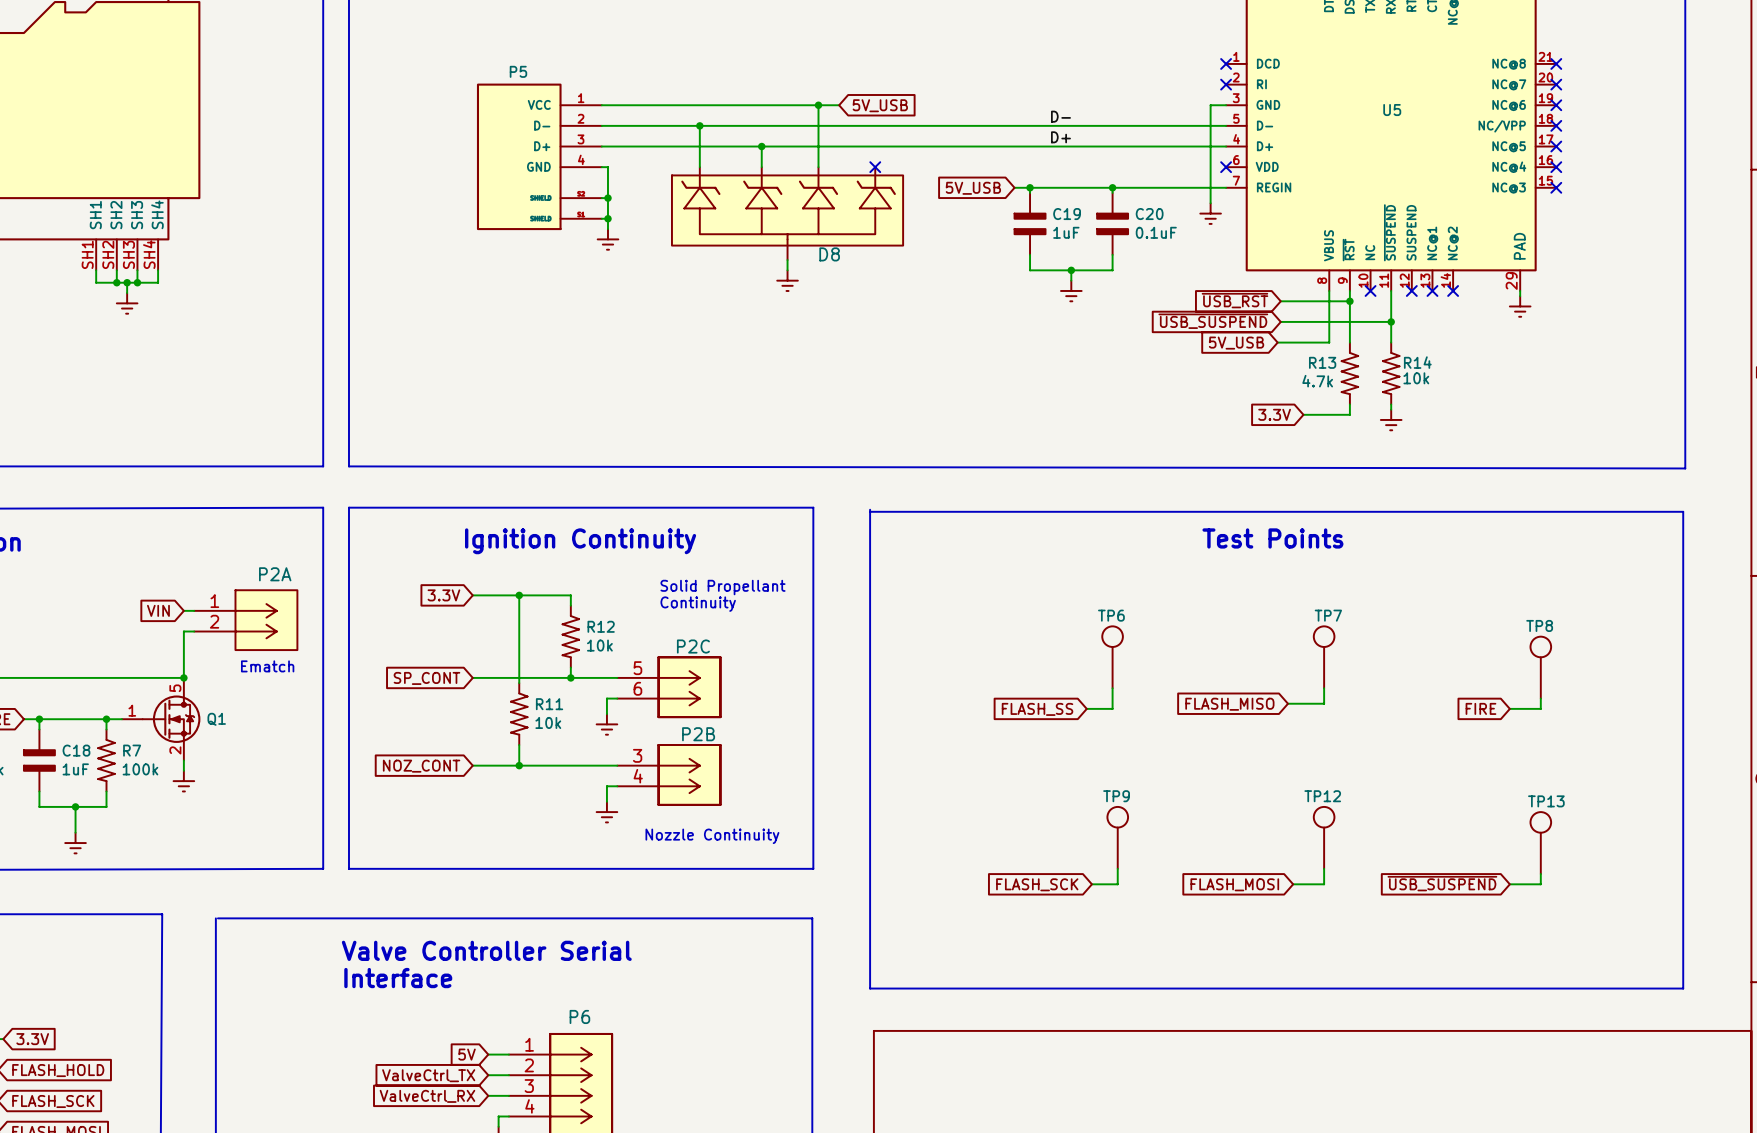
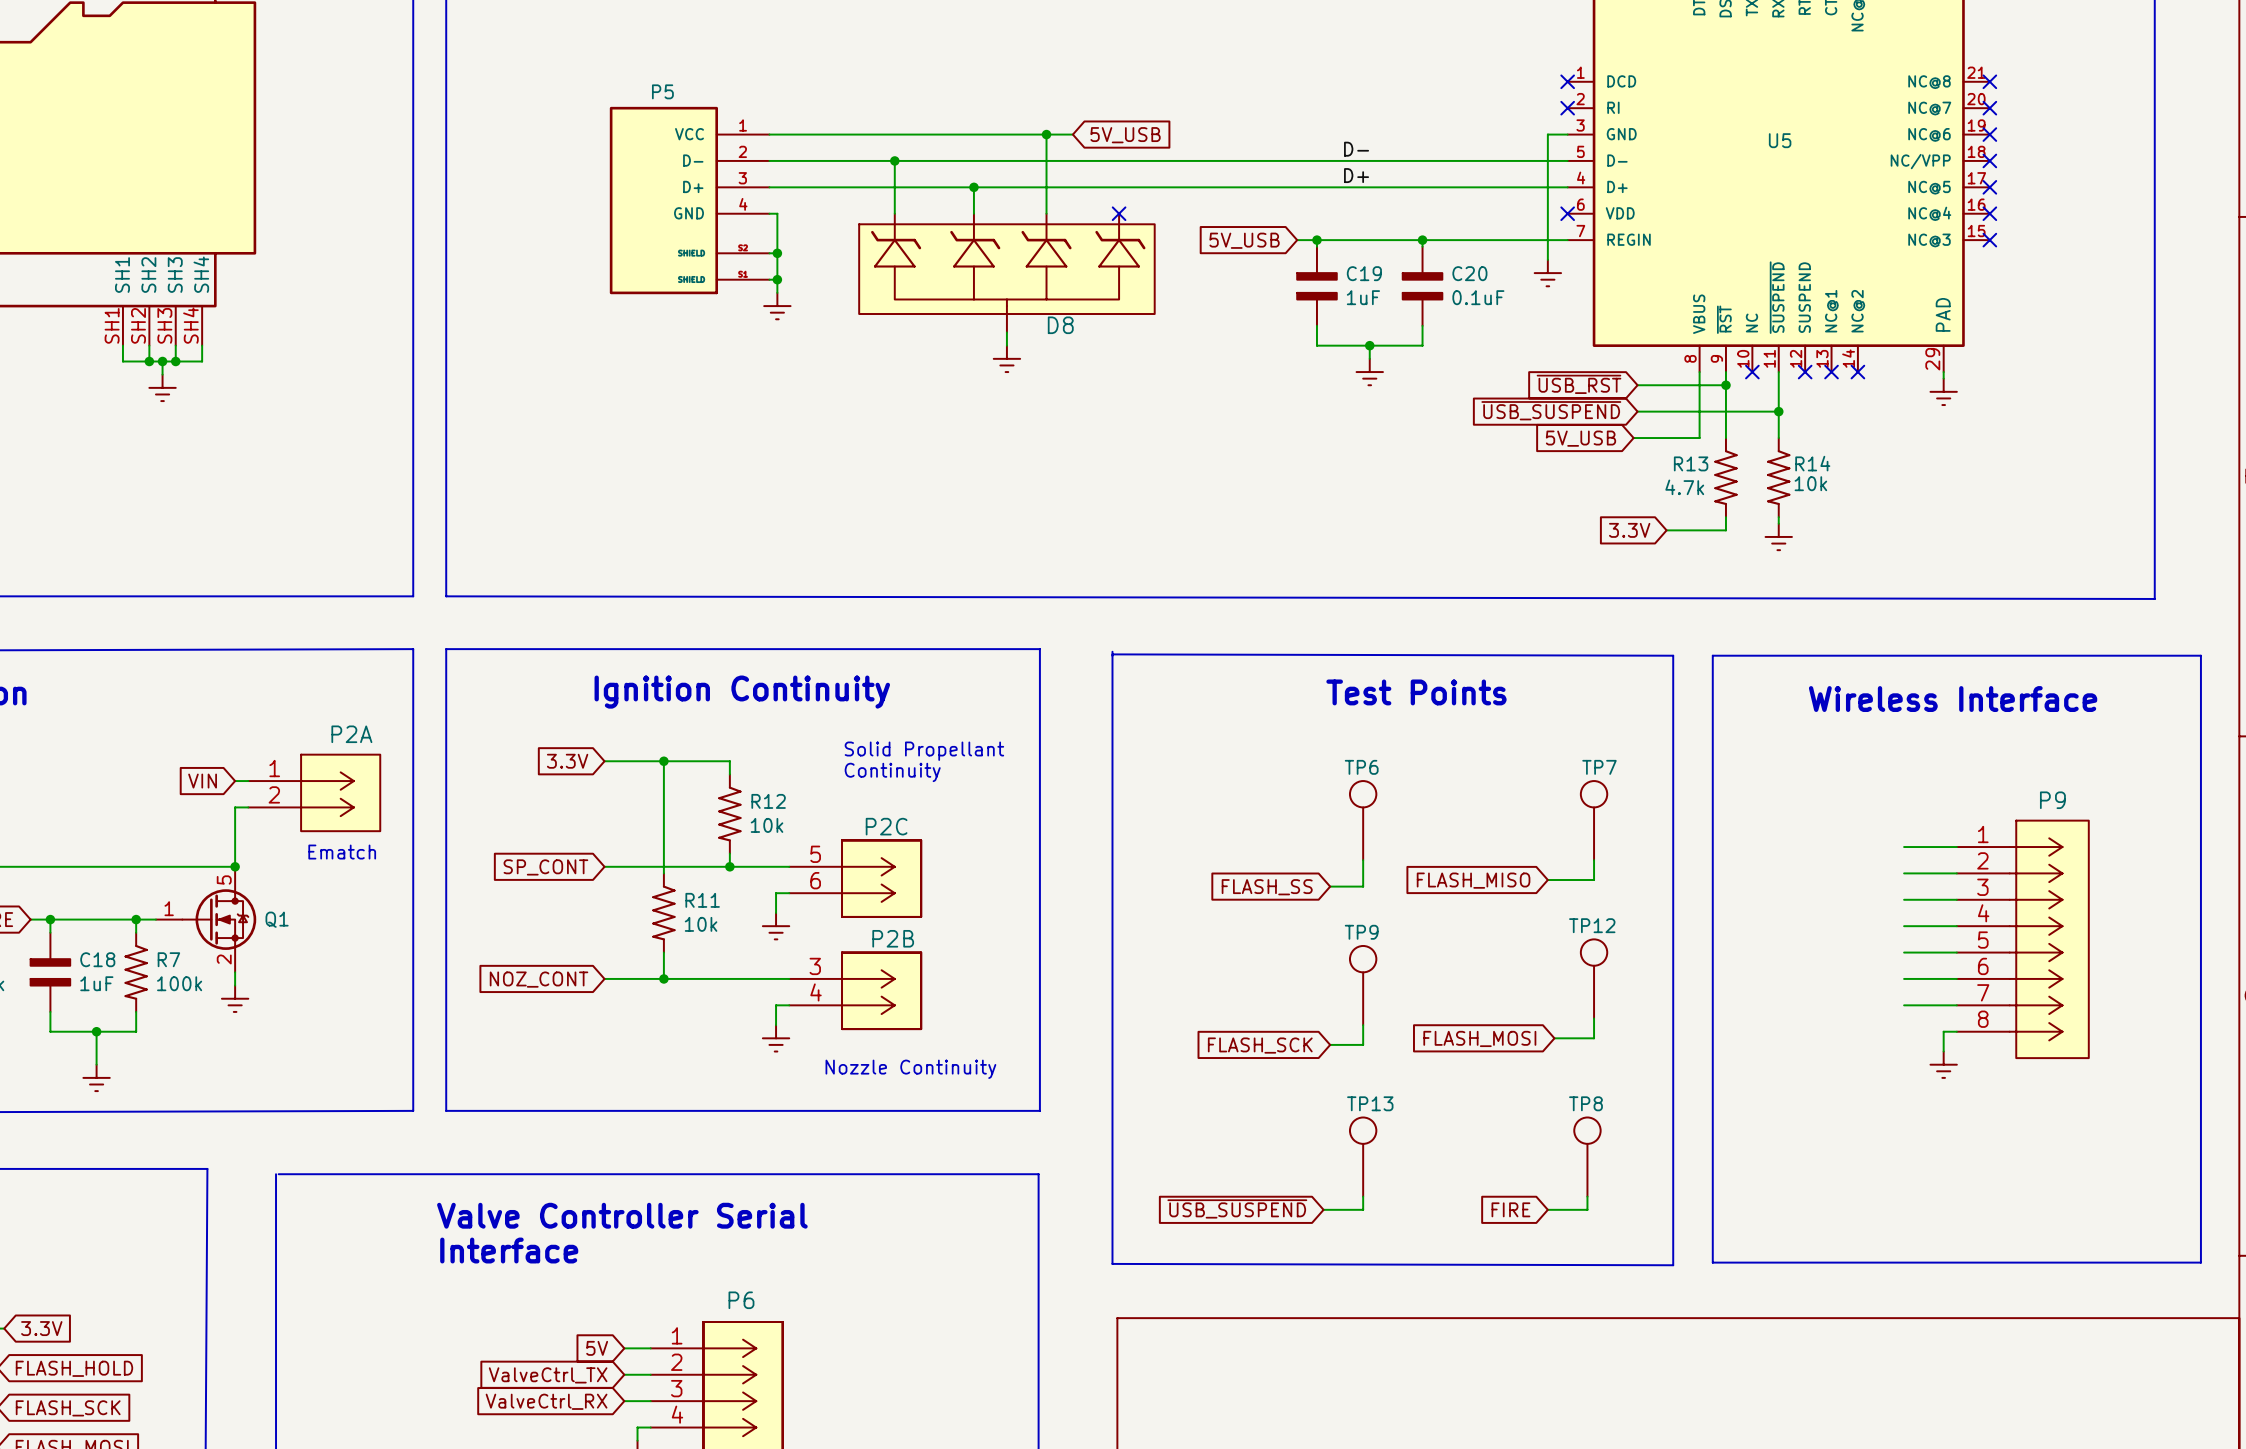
line: (870, 511) (1683, 511) (1683, 988) (870, 988) -> (1112, 654) (1673, 655) (1673, 1265) (1112, 1263)
line: none -> (1712, 655) (2200, 655) (2200, 1262) (1712, 1262) (1712, 655)
text position: Test Points (1272, 538) -> Test Points (1416, 692)
text: none -> Wireless Interface (1953, 699)
TP6 position: (1112, 657) -> (1363, 820)
TP7 position: (1324, 657) -> (1594, 820)
wire: none -> (1904, 847) (1956, 847)
TP8 position: (1540, 667) -> (1587, 1157)
wire: none -> (1904, 873) (1956, 873)
wire: (1112, 688) (1112, 708) (1086, 708) -> (1363, 860) (1363, 886) (1330, 886)
wire: (1324, 688) (1324, 703) (1288, 703) -> (1594, 860) (1594, 880) (1547, 880)
wire: (1540, 698) (1540, 708) (1509, 708) -> none
wire: none -> (1904, 899) (1956, 899)
global label position: FLASH_MISO (1229, 704) -> FLASH_MISO (1473, 880)
global label: FIRE (1480, 708) -> none
global label position: FLASH_SS (1037, 709) -> FLASH_SS (1267, 887)
wire: none -> (1904, 926) (1956, 926)
P9: none -> (2023, 939)
wire: none -> (1904, 952) (1956, 952)
wire: none -> (1904, 978) (1956, 978)
wire: none -> (1904, 1005) (1956, 1005)
wire: none -> (1956, 1031) (1943, 1031) (1943, 1051)
power symbol: none -> (1943, 1064)
TP9 position: (1117, 837) -> (1363, 985)
TP12 position: (1324, 837) -> (1594, 978)
TP13 position: (1540, 843) -> (1363, 1157)
wire: (1117, 868) (1117, 884) (1091, 884) -> (1363, 1025) (1363, 1044) (1330, 1044)
wire: (1324, 868) (1324, 884) (1293, 884) -> (1594, 1018) (1594, 1038) (1554, 1038)
wire: (1540, 874) (1540, 884) (1509, 884) -> none
global label: ~{USB_SUSPEND} (1442, 883) -> none
global label position: FLASH_SCK (1037, 884) -> FLASH_SCK (1260, 1045)
global label position: FLASH_MOSI (1234, 884) -> FLASH_MOSI (1479, 1038)
wire: none -> (1363, 1196) (1363, 1209) (1323, 1209)
wire: none -> (1587, 1196) (1587, 1209) (1547, 1209)
global label: none -> ~{USB_SUSPEND} (1237, 1208)
global label: none -> FIRE (1510, 1209)

